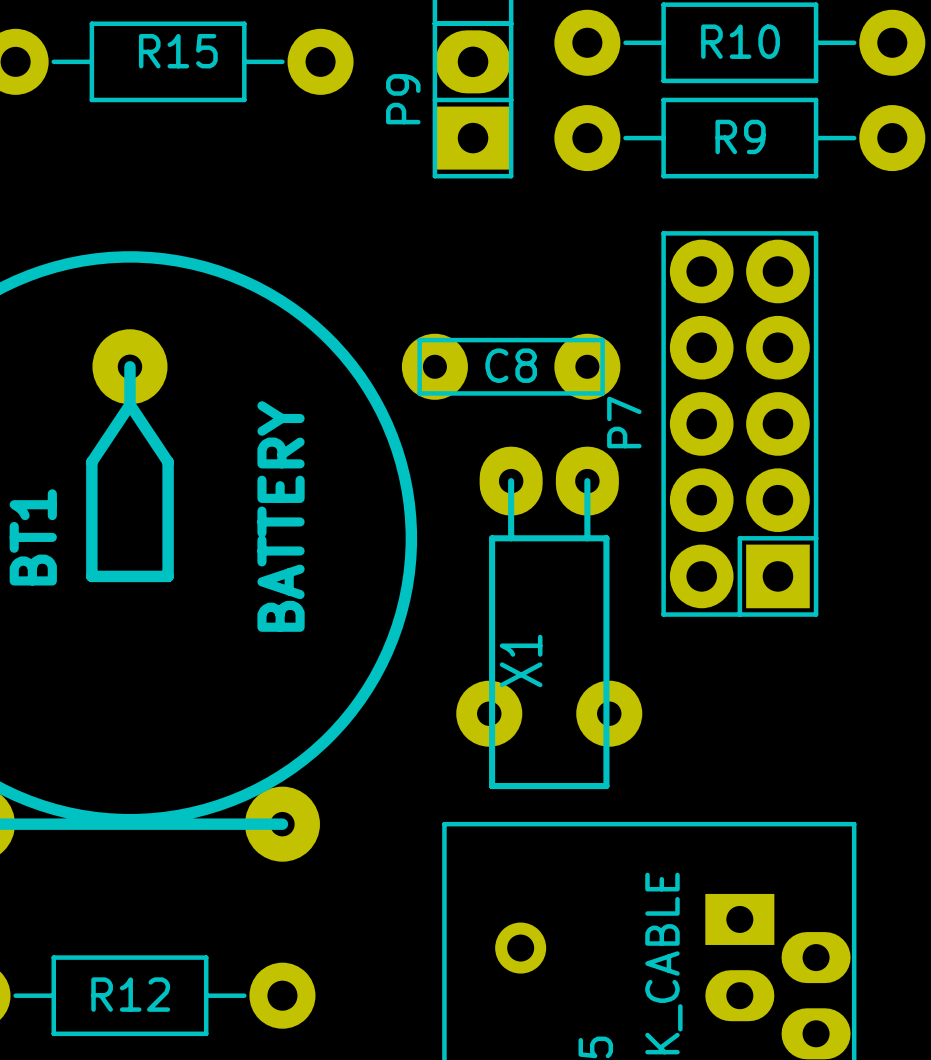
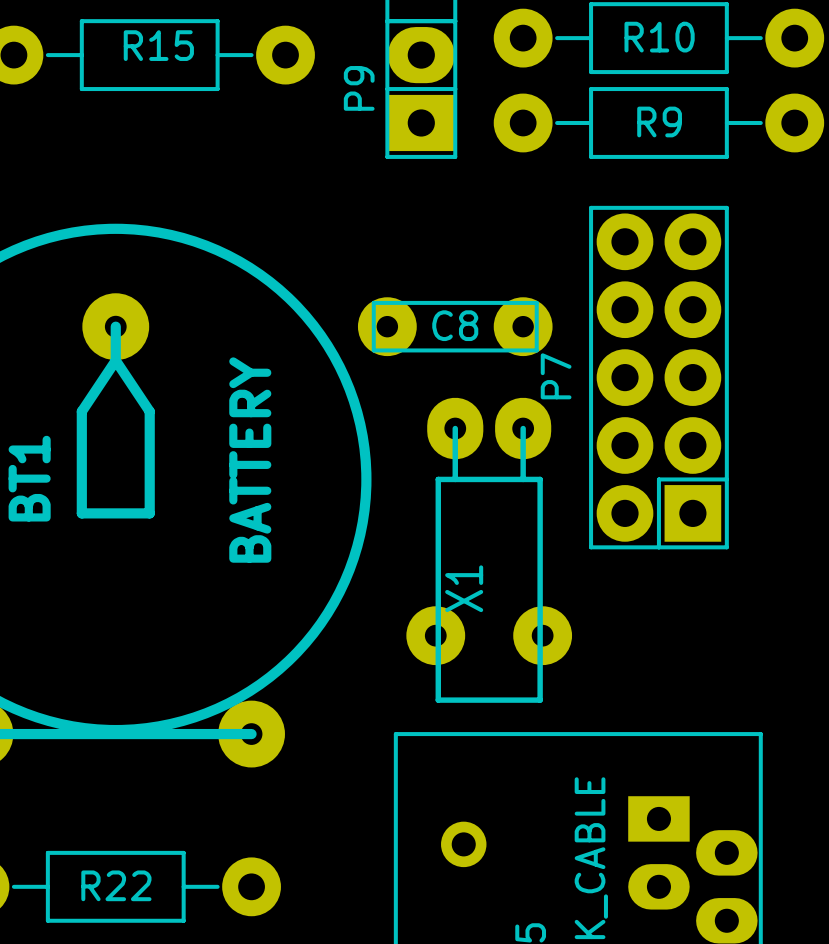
R12 name: R12 (130, 994) -> R22 (116, 885)

